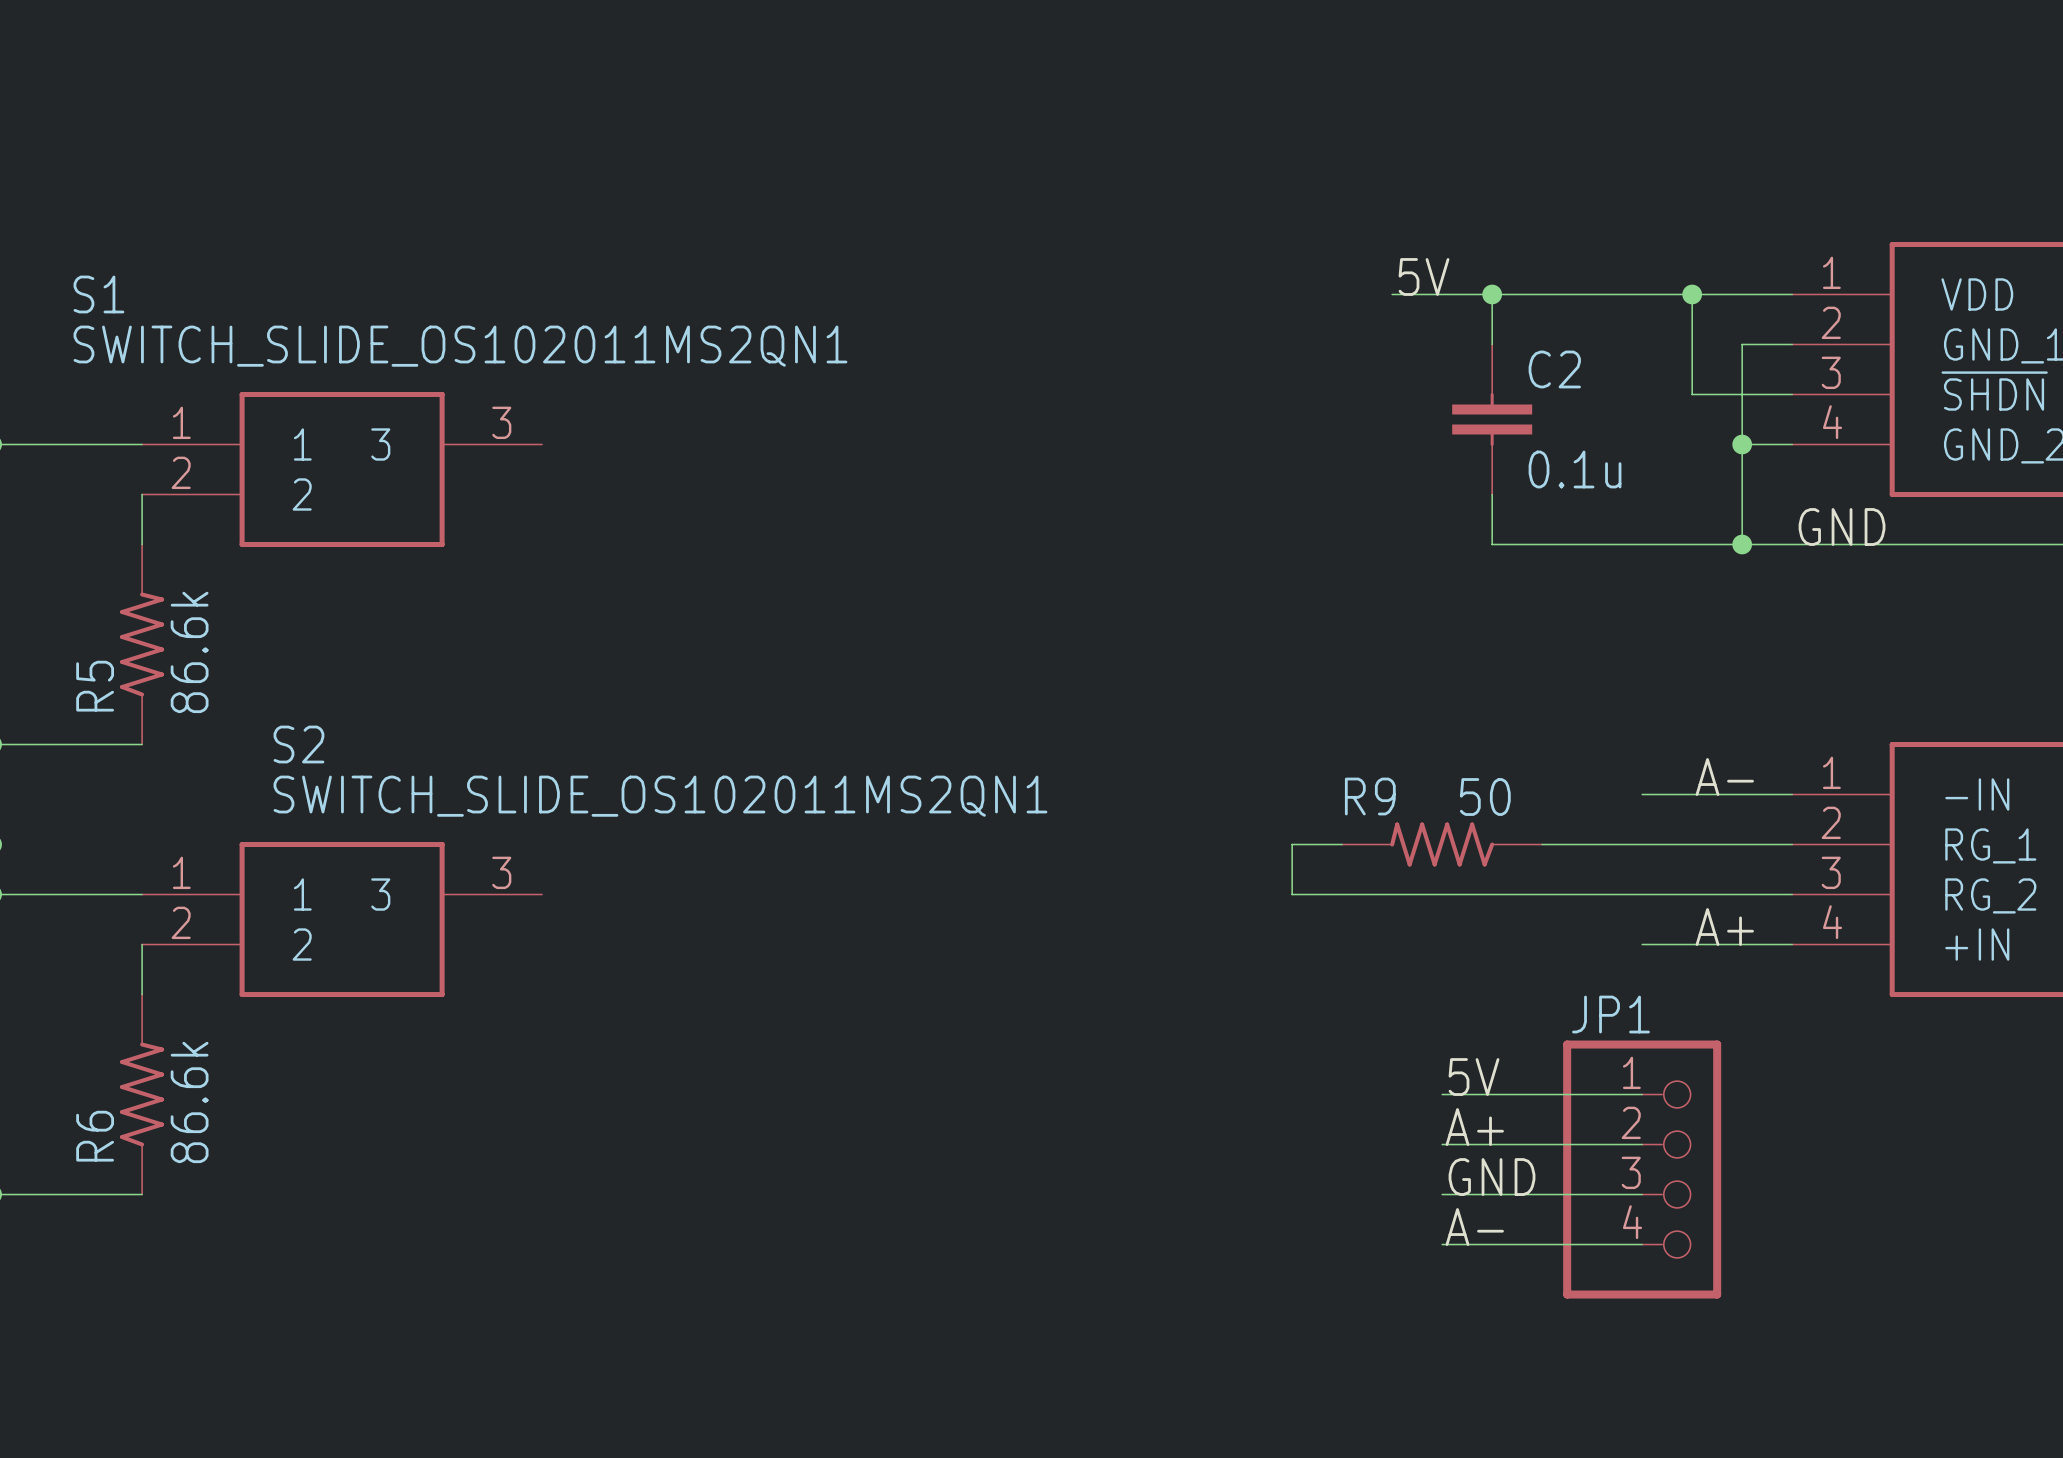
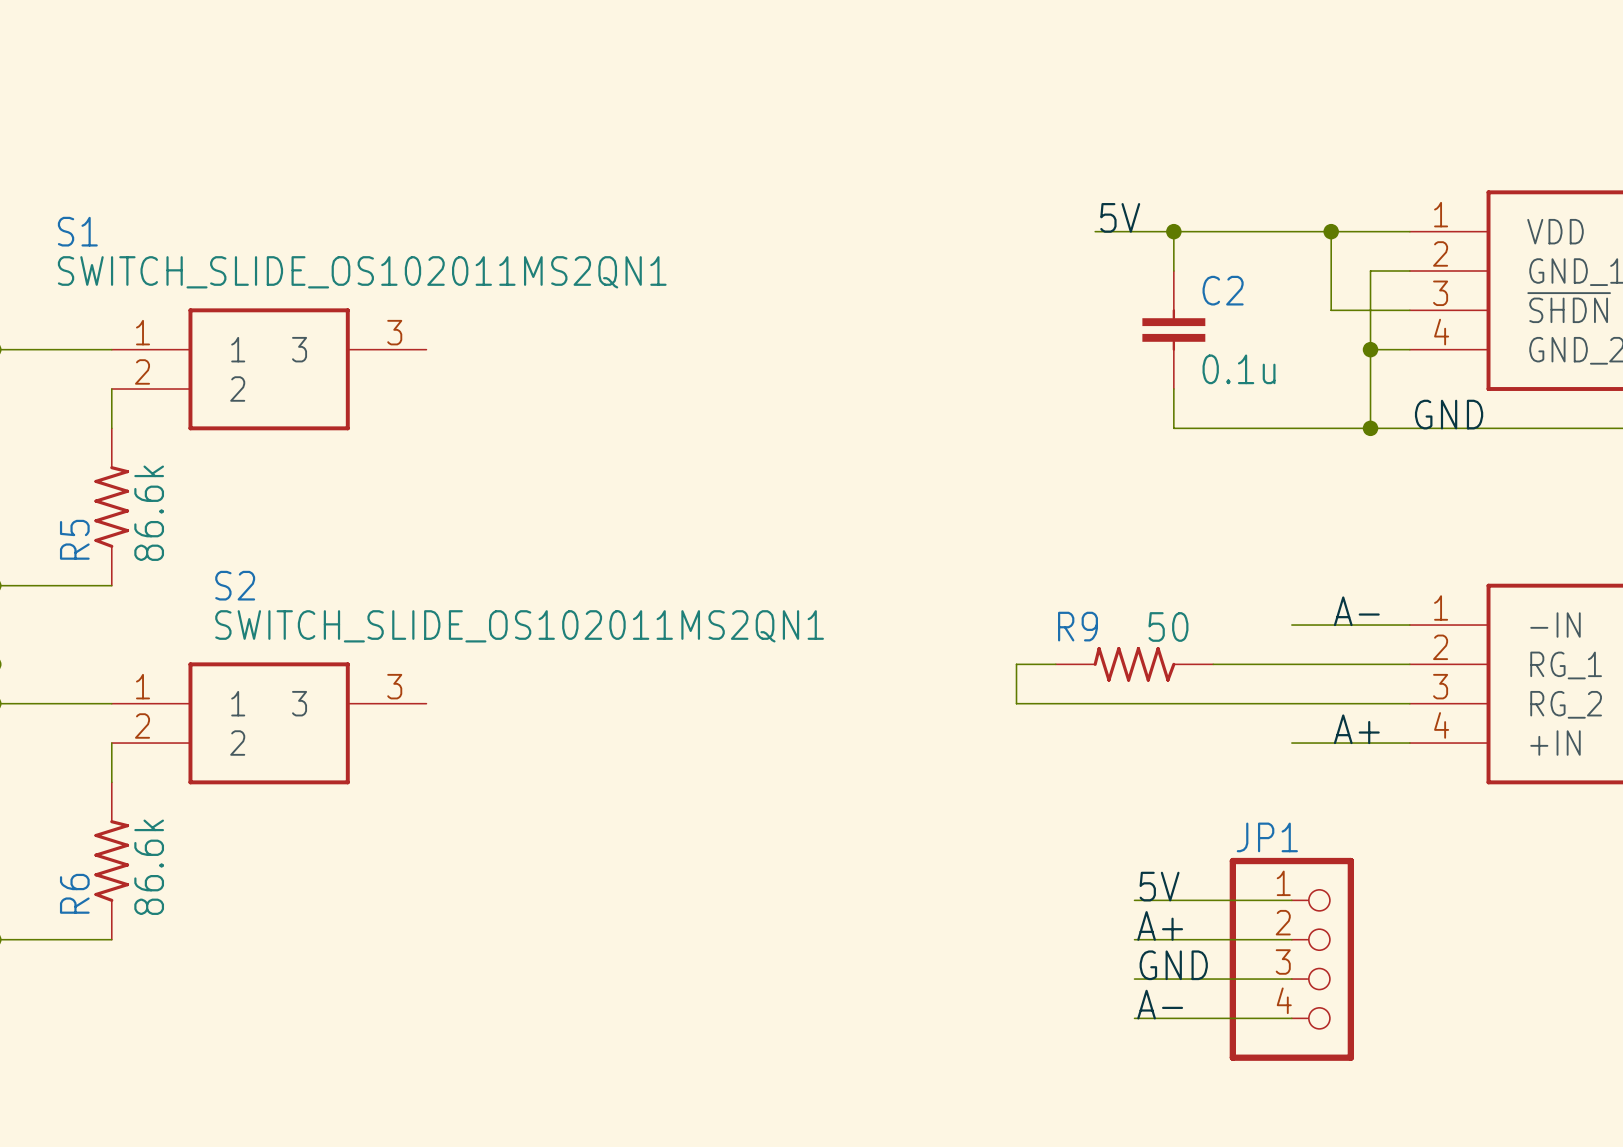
label: 5V (1474, 1077) -> none
wire: (1442, 1094) (1642, 1094) -> (1134, 1018) (1291, 1018)
label: A+ (1474, 1127) -> 5V (1159, 886)
JP1 position: (1642, 1169) -> (1291, 959)
label: GND (1492, 1177) -> A+ (1160, 925)
label: A- (1474, 1227) -> GND (1173, 965)
label: none -> A- (1160, 1004)

